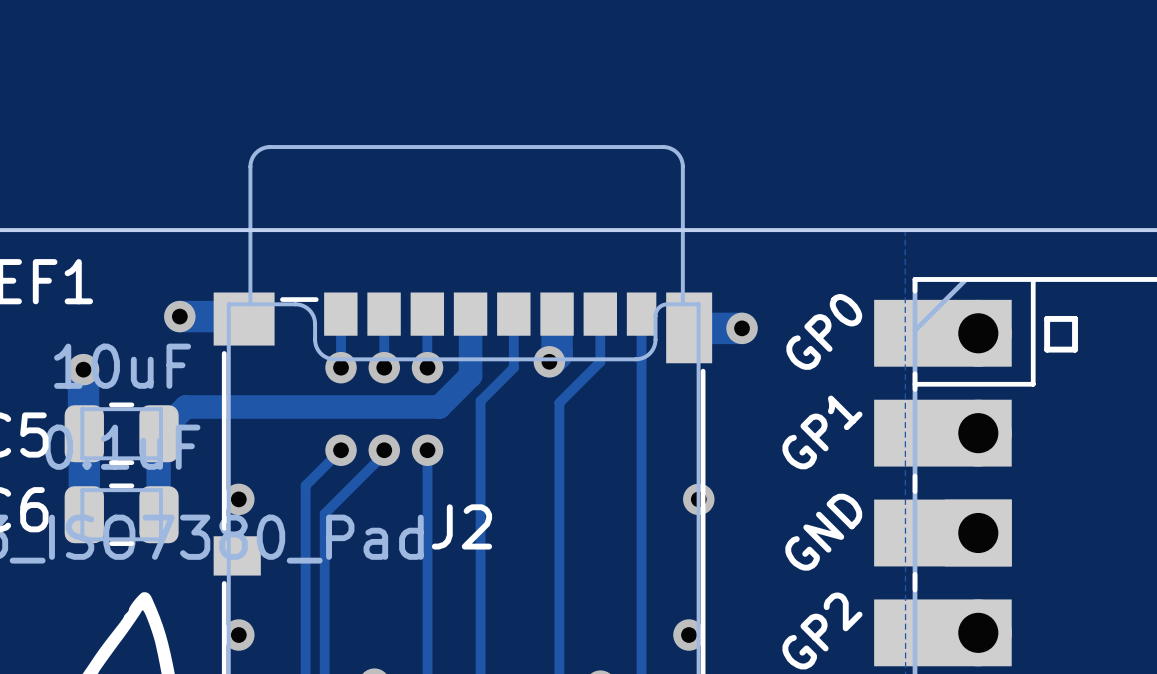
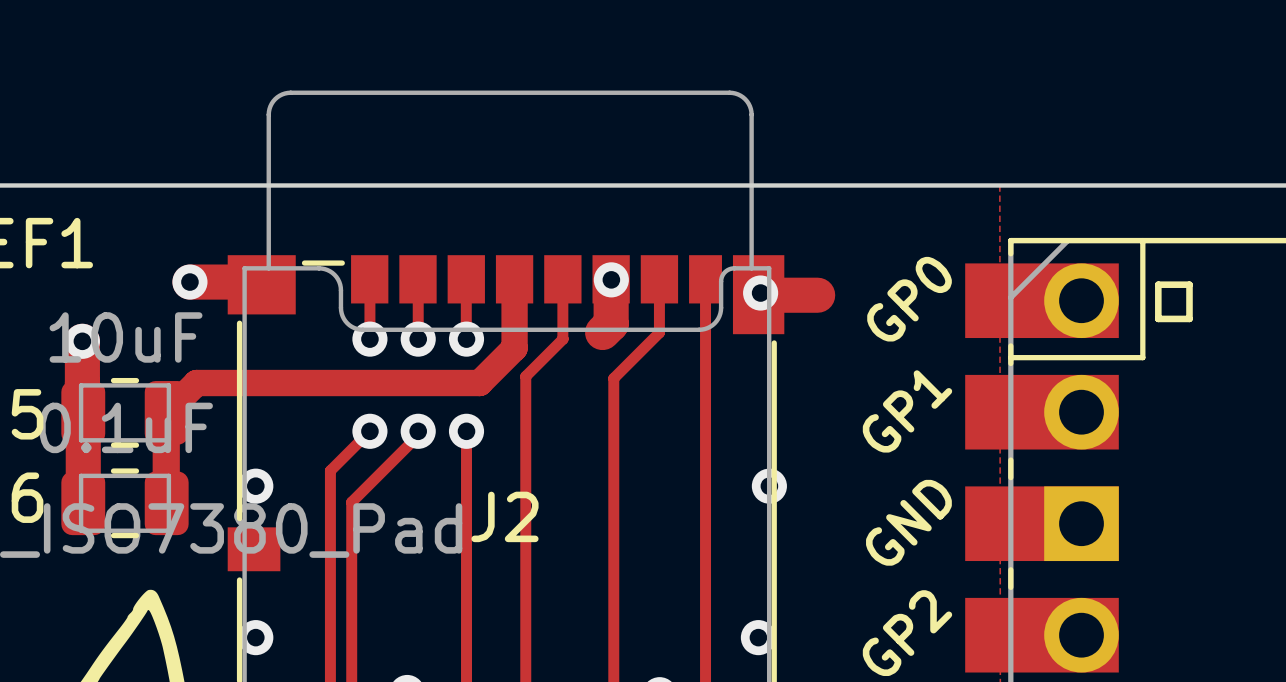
via position: (742, 328) -> (760, 293)
via position: (549, 361) -> (611, 279)

